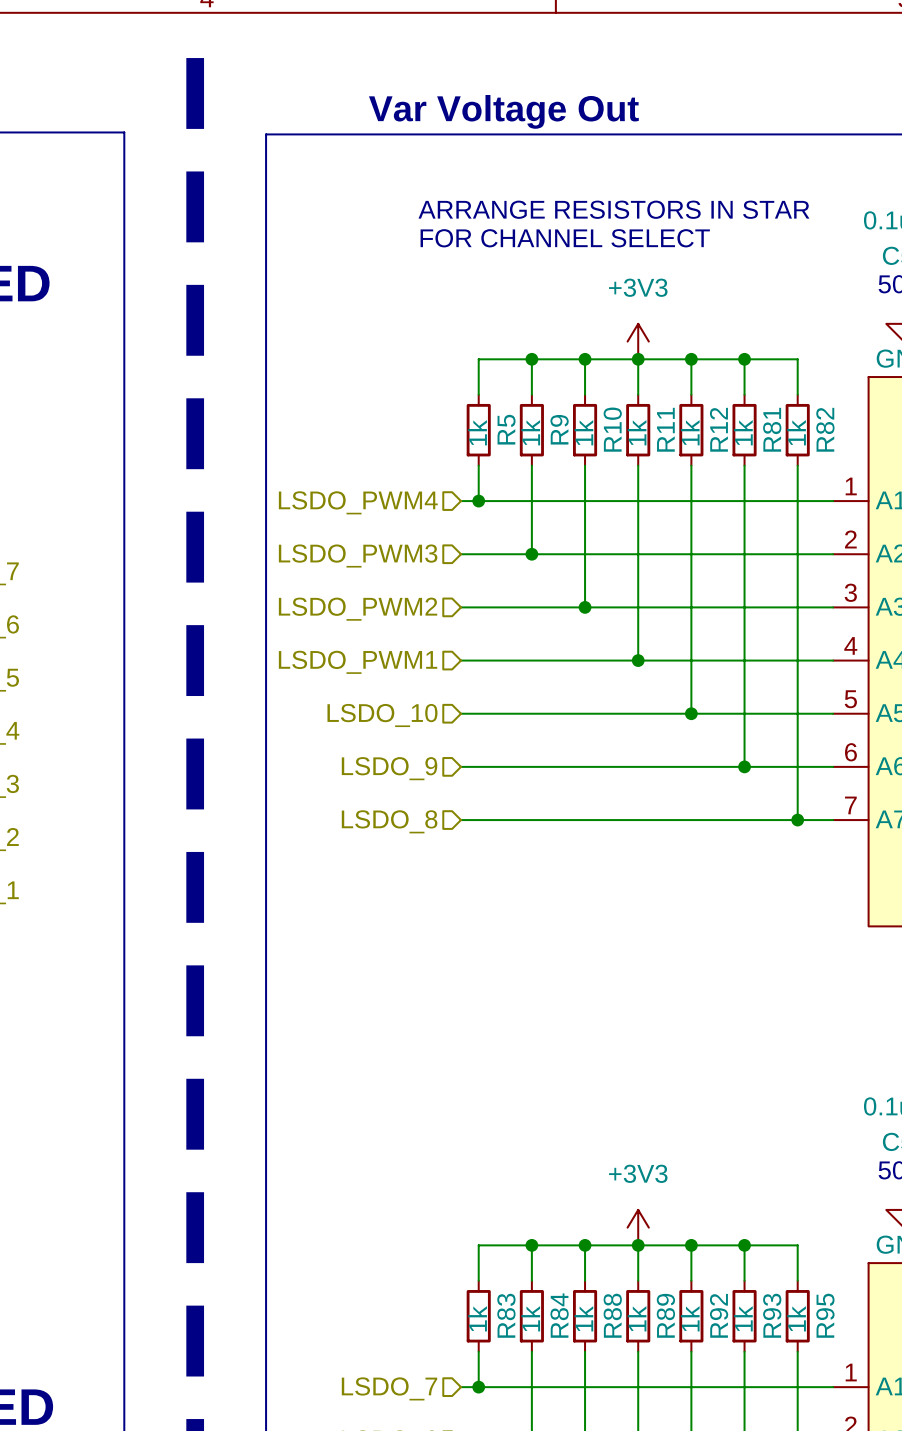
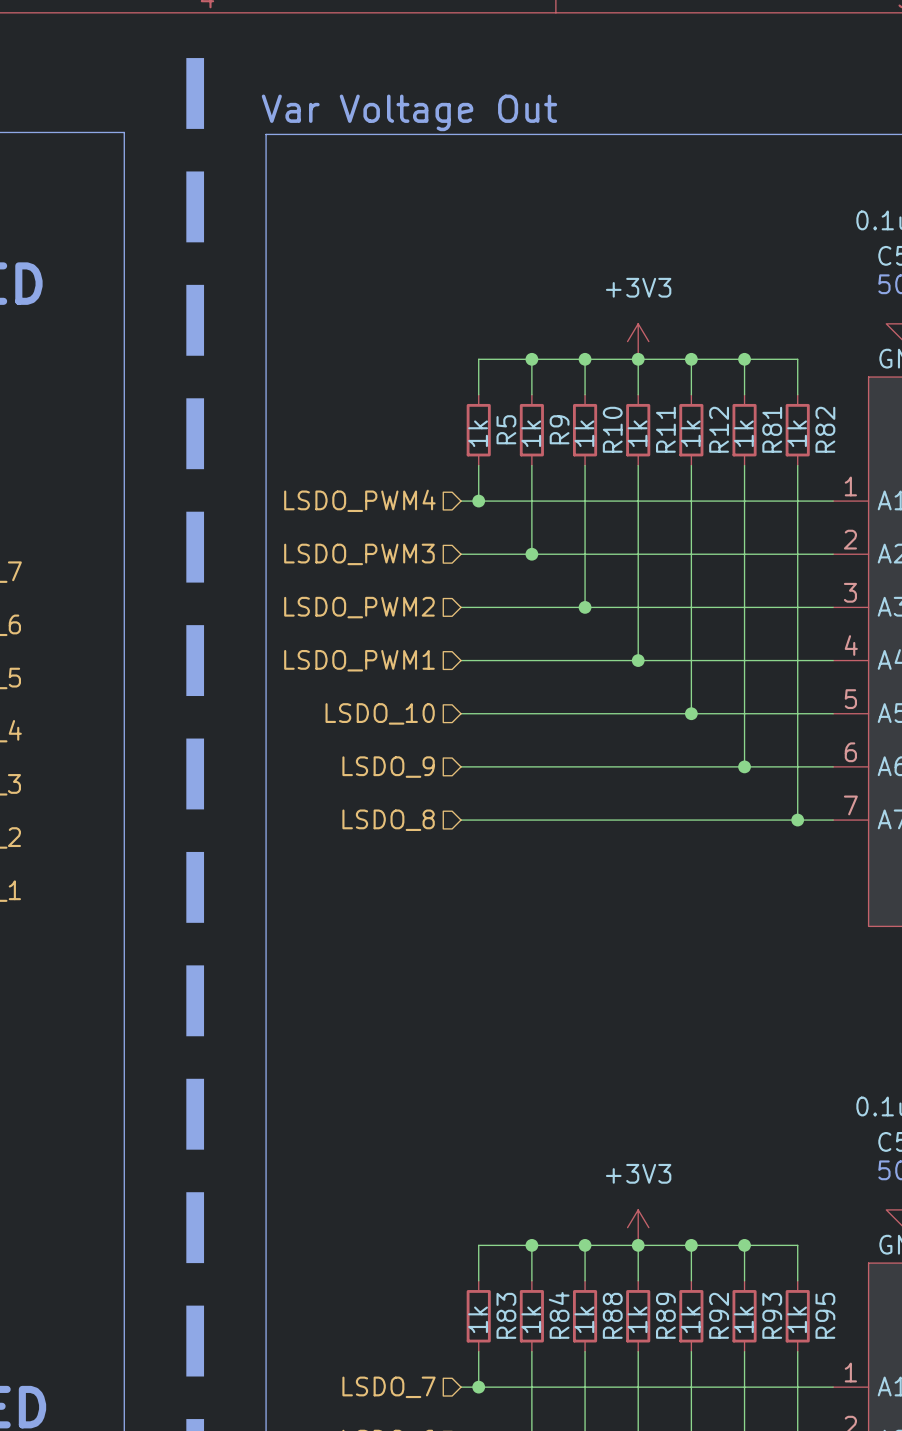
text position: Var Voltage Out (503, 111) -> Var Voltage Out (409, 112)
text: ARRANGE RESISTORS IN STAR (613, 209) -> none
text: FOR CHANNEL SELECT (565, 238) -> none

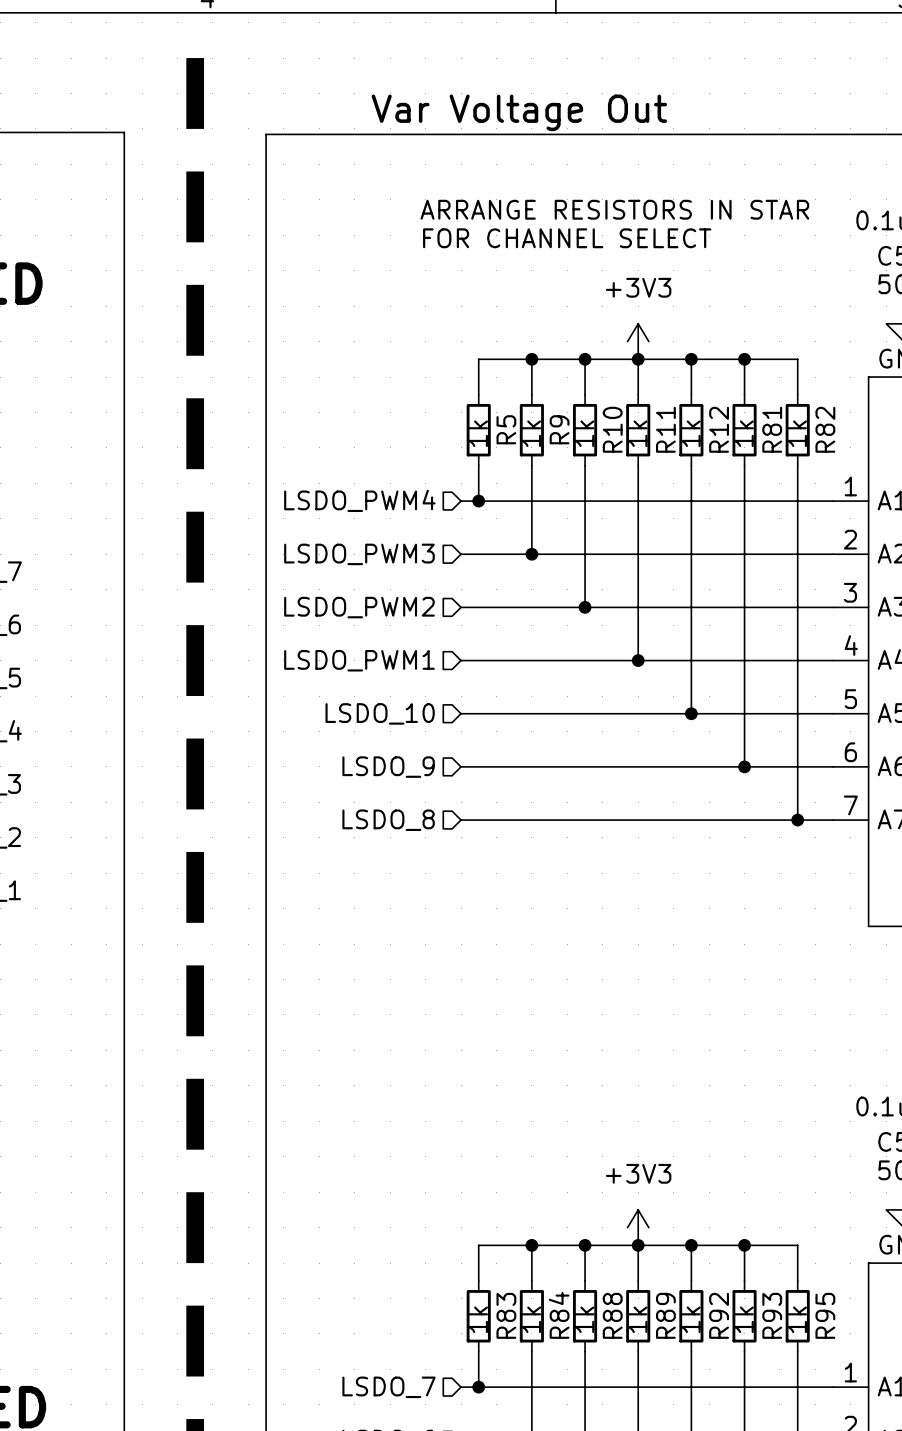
text position: Var Voltage Out (409, 112) -> Var Voltage Out (519, 112)
text: none -> ARRANGE RESISTORS IN STAR (614, 209)
text: none -> FOR CHANNEL SELECT (567, 238)

